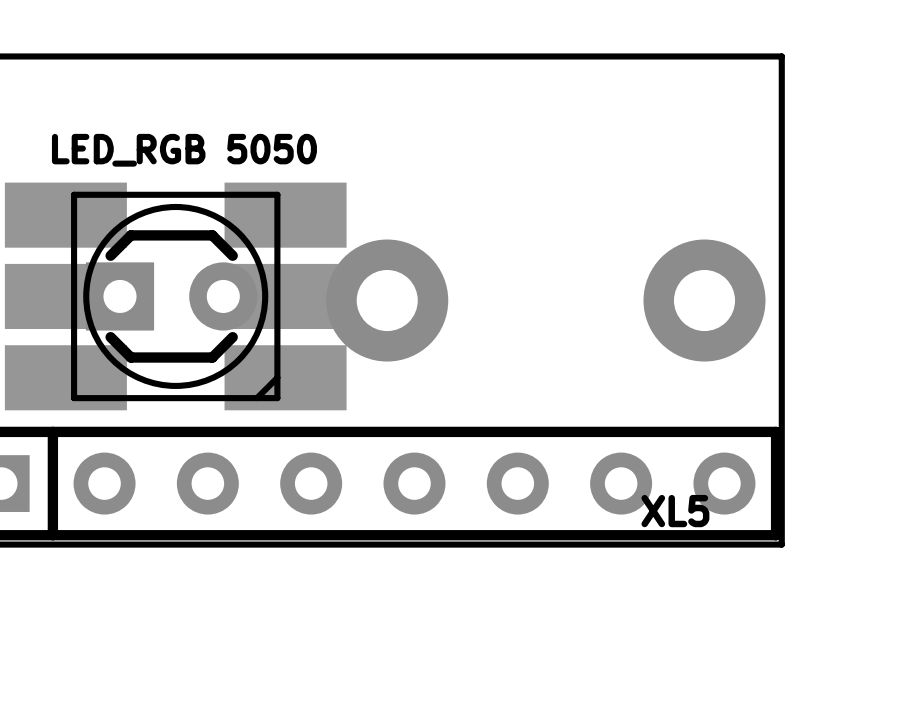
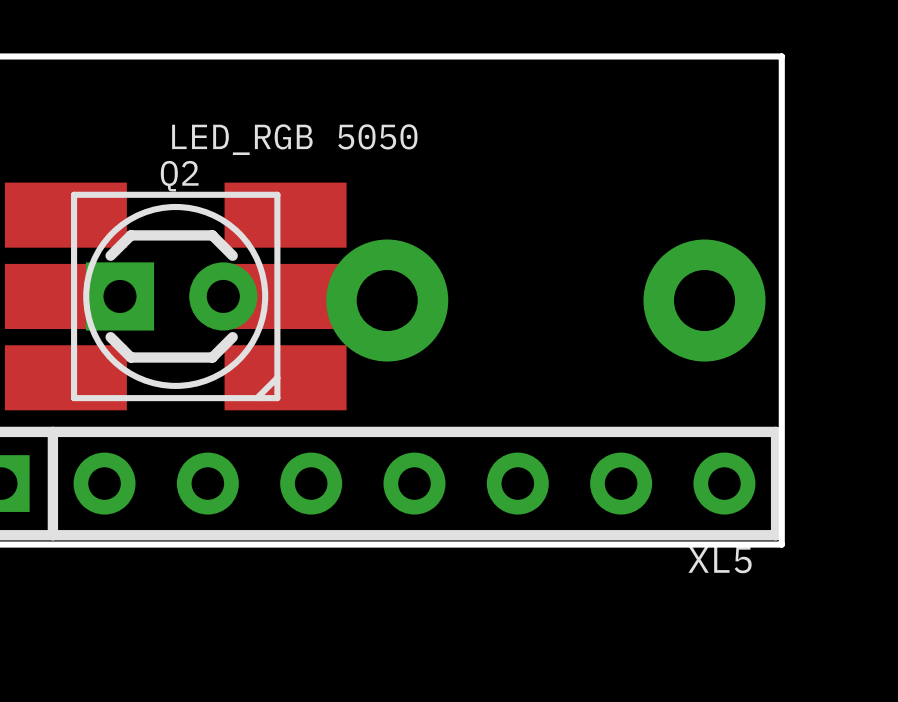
Q2 value position: LED_RGB 5050 (184, 150) -> LED_RGB 5050 (294, 139)
Q2 name: none -> Q2 (179, 176)
XL5 name position: XL5 (675, 511) -> XL5 (720, 560)

